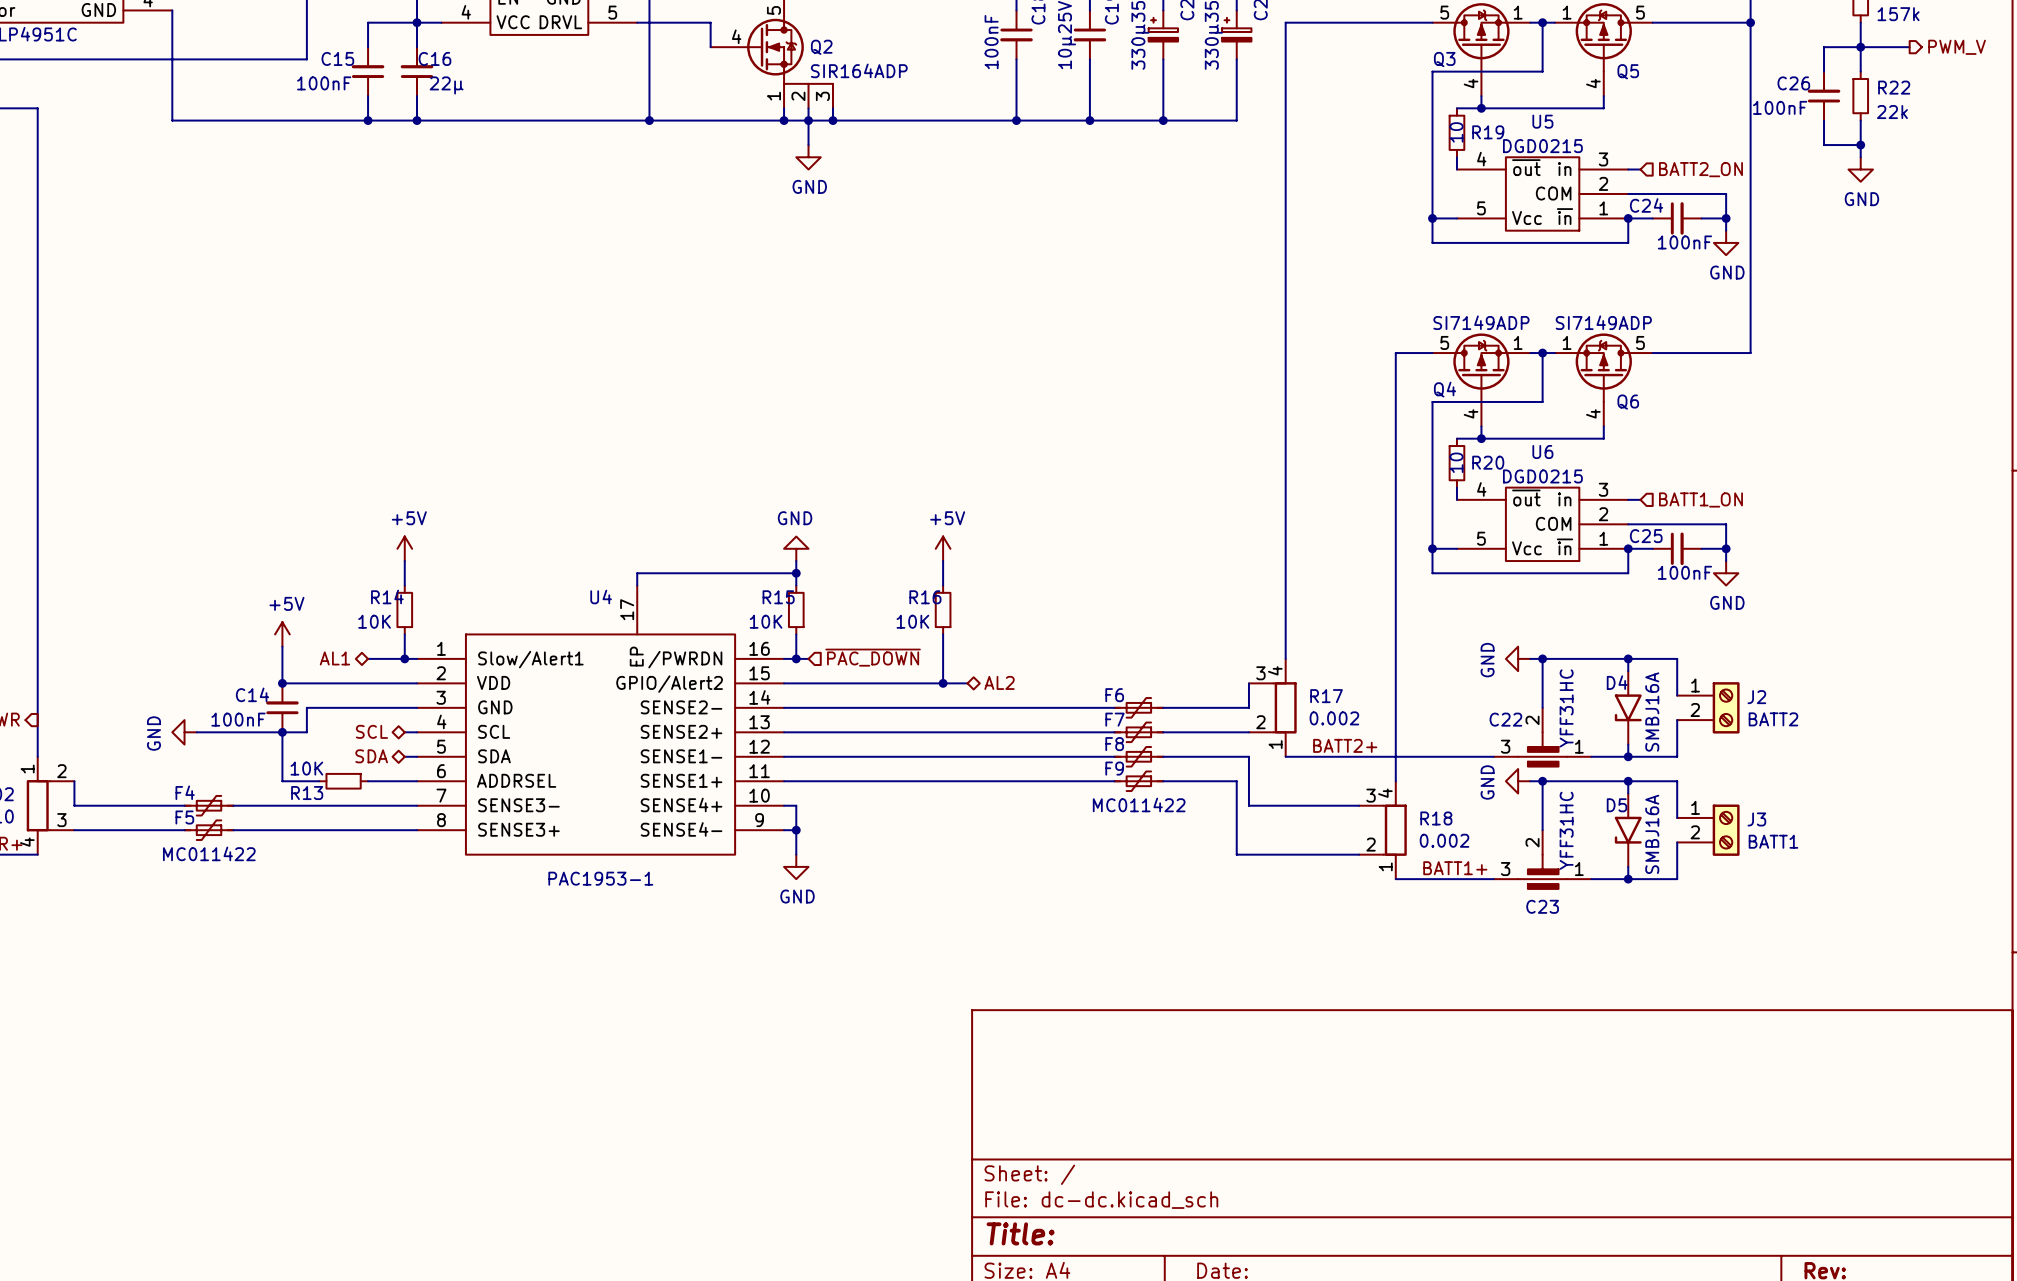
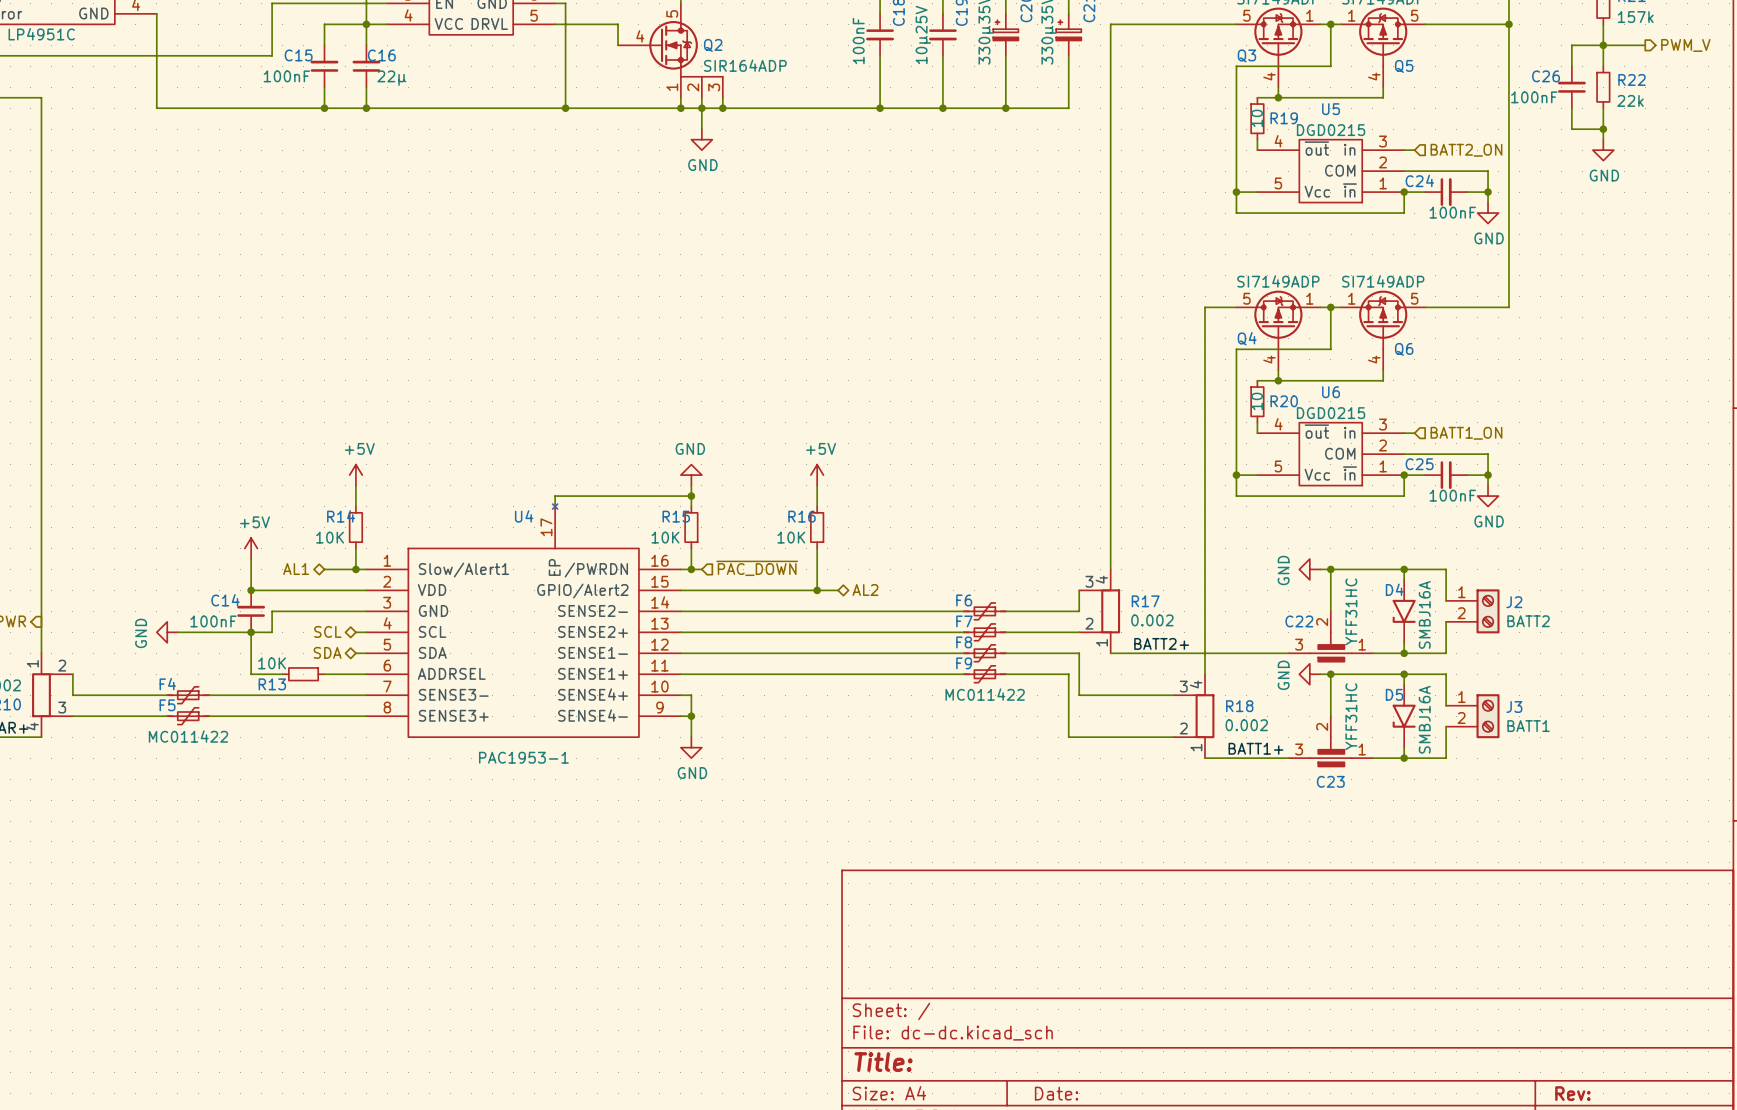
U4 symbol: [417, 585, 785, 855] -> [366, 504, 681, 738]

